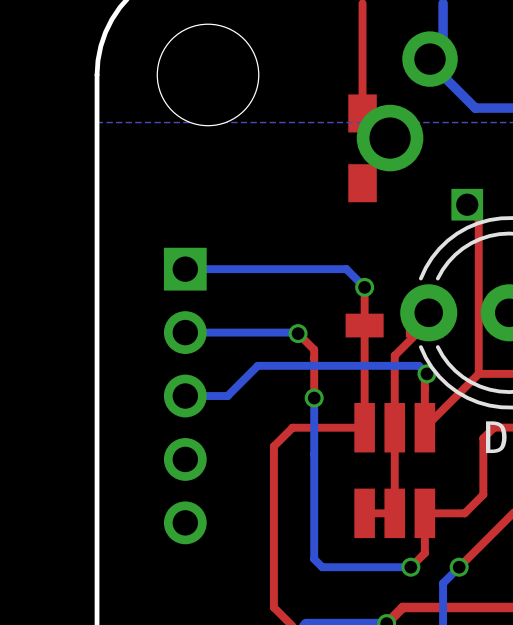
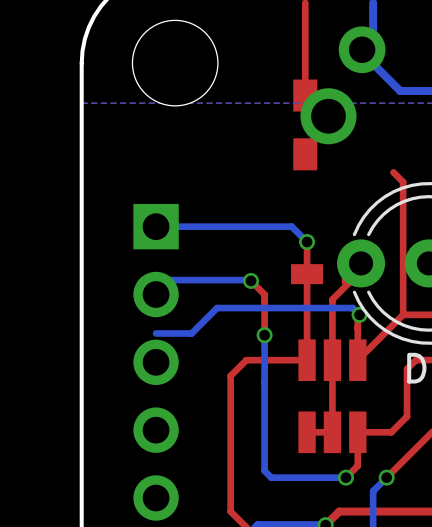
part: (467, 204) -> none
part: (185, 396) -> none
part: none -> (156, 362)

